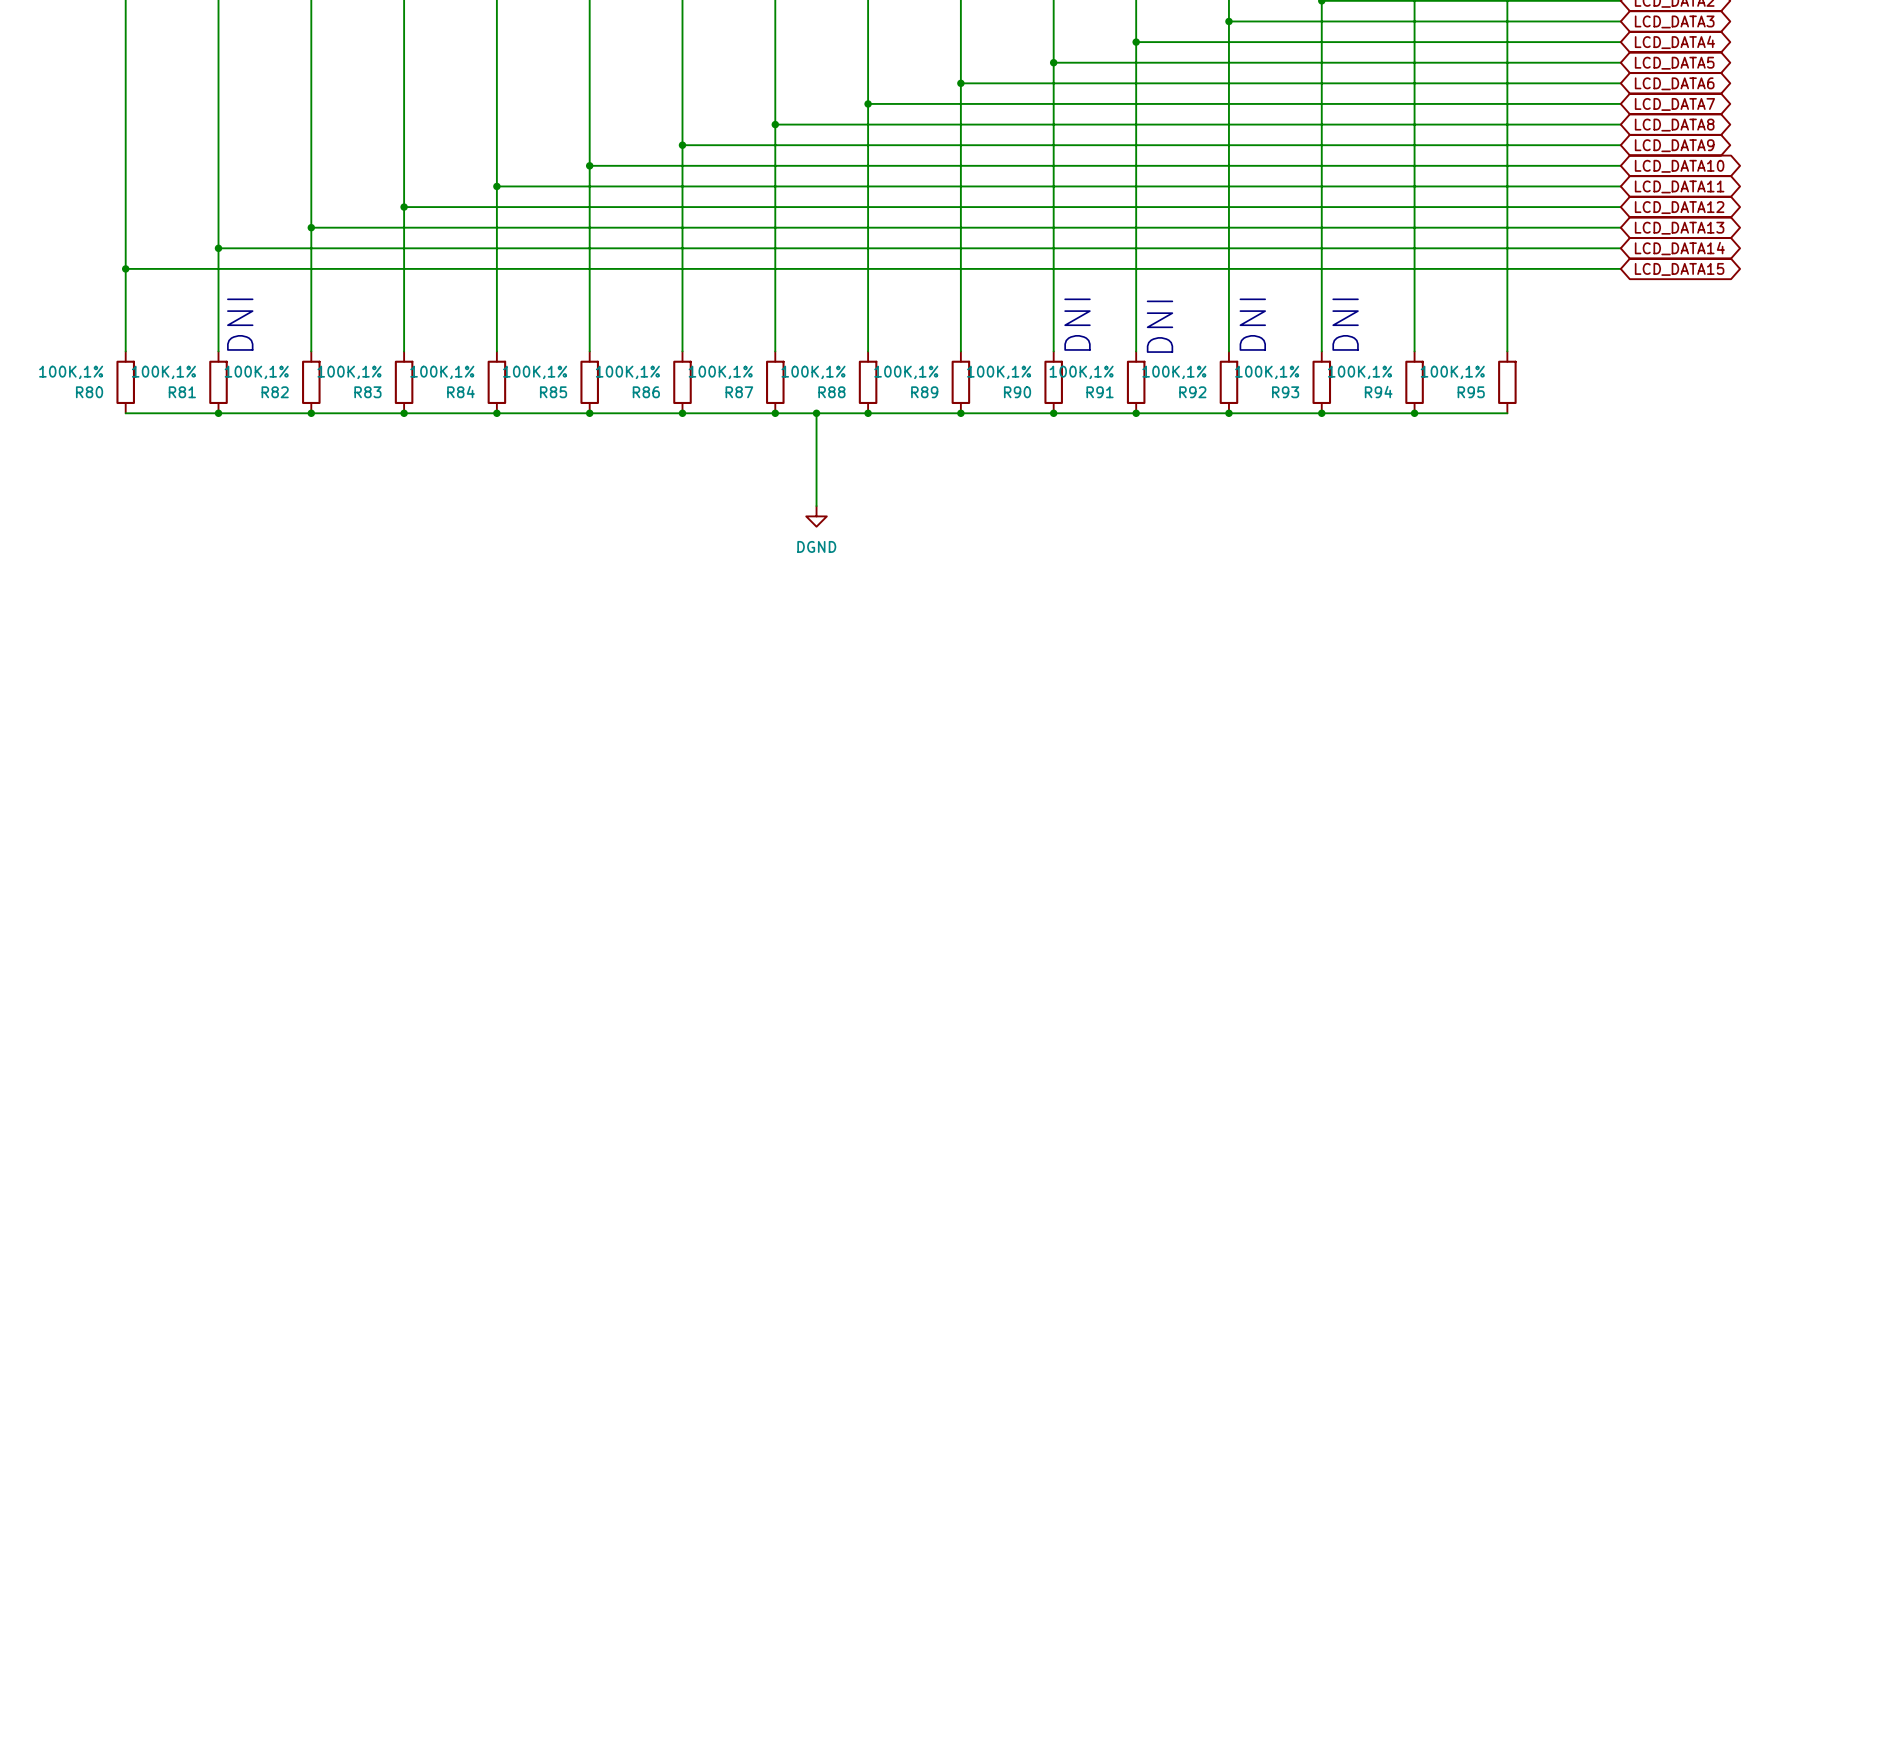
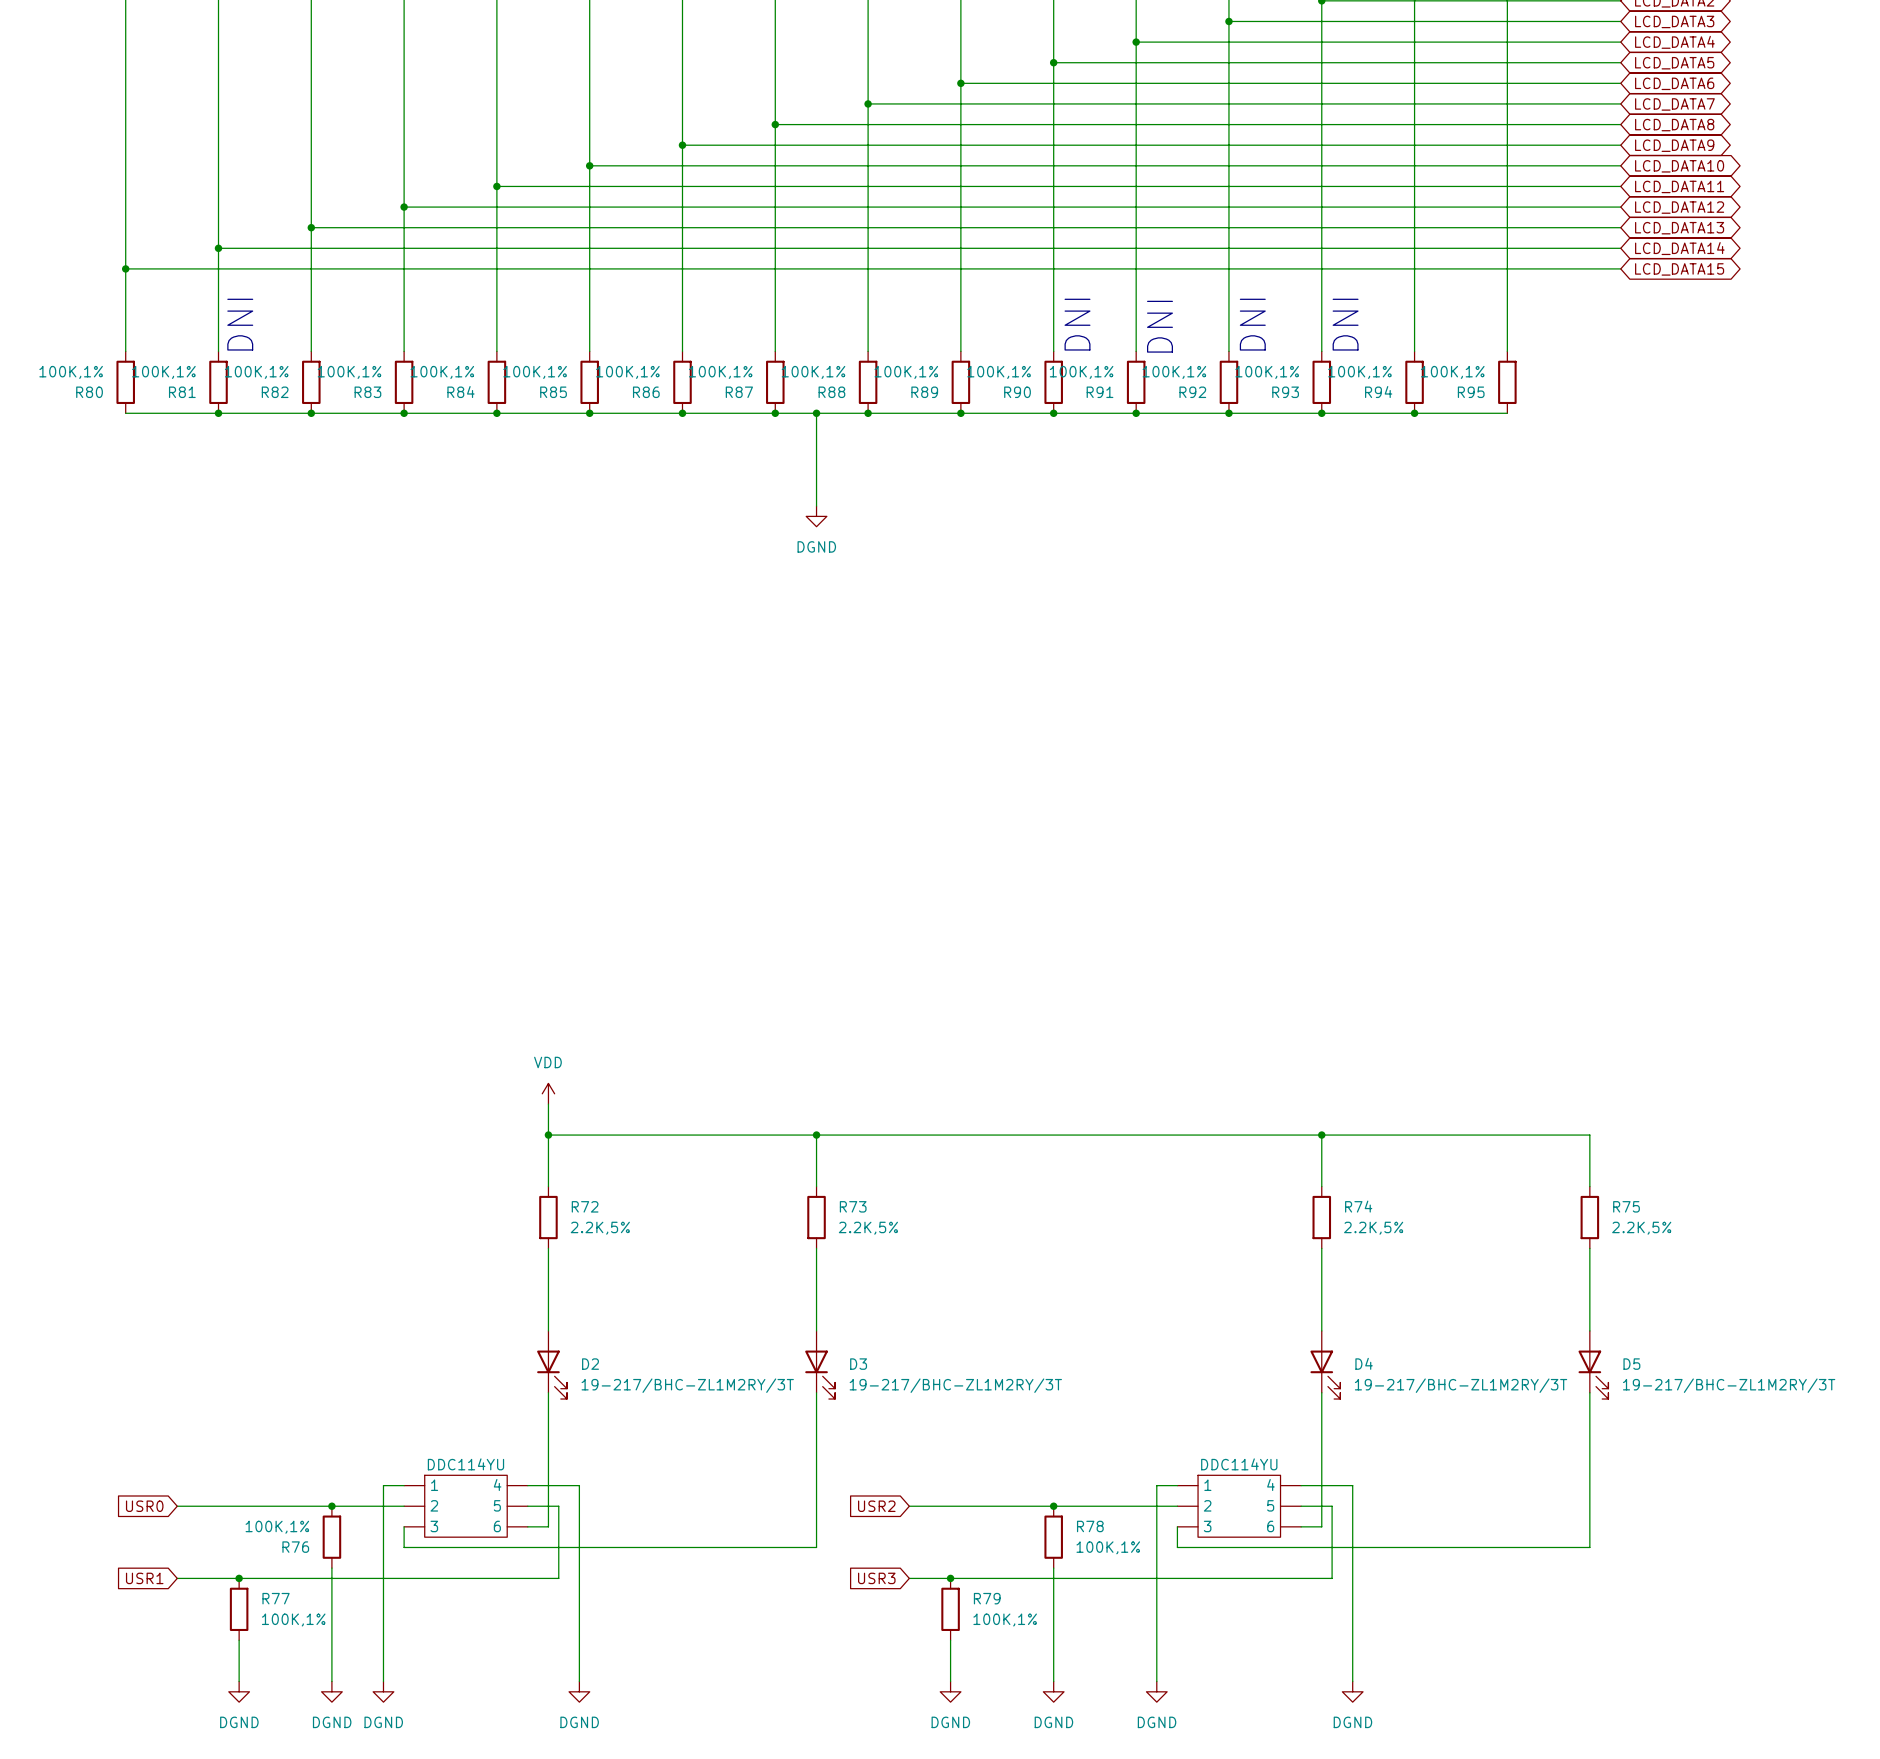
power symbol: none -> VDD (548, 1093)
wire: none -> (548, 1104) (548, 1186)
wire: none -> (548, 1135) (1589, 1135) (1589, 1186)
junction: none -> (548, 1135)
wire: none -> (816, 1135) (816, 1186)
junction: none -> (816, 1135)
wire: none -> (1321, 1135) (1321, 1186)
junction: none -> (1321, 1135)
R72: none -> 2.2K,5% (548, 1217)
R73: none -> 2.2K,5% (816, 1217)
R74: none -> 2.2K,5% (1321, 1217)
R75: none -> 2.2K,5% (1589, 1217)
wire: none -> (548, 1248) (548, 1330)
wire: none -> (816, 1248) (816, 1330)
wire: none -> (1321, 1248) (1321, 1330)
wire: none -> (1589, 1248) (1589, 1330)
D2: none -> 19-217/BHC-ZL1M2RY/3T (552, 1364)
D3: none -> 19-217/BHC-ZL1M2RY/3T (820, 1364)
D4: none -> 19-217/BHC-ZL1M2RY/3T (1325, 1364)
D5: none -> 19-217/BHC-ZL1M2RY/3T (1593, 1364)
wire: none -> (548, 1392) (548, 1526) (527, 1526)
wire: none -> (816, 1392) (816, 1547) (404, 1547) (404, 1526)
wire: none -> (1321, 1392) (1321, 1526) (1301, 1526)
wire: none -> (1589, 1392) (1589, 1547) (1177, 1547) (1177, 1526)
wire: none -> (404, 1485) (383, 1485) (383, 1681)
wire: none -> (527, 1485) (579, 1485) (579, 1681)
wire: none -> (1177, 1485) (1156, 1485) (1156, 1681)
wire: none -> (1301, 1485) (1352, 1485) (1352, 1681)
global label: none -> USR0 (144, 1506)
wire: none -> (177, 1506) (404, 1506)
junction: none -> (331, 1506)
part: none -> DDC114YU (465, 1506)
wire: none -> (527, 1506) (558, 1506) (558, 1578) (177, 1578)
global label: none -> USR2 (876, 1506)
wire: none -> (909, 1506) (1177, 1506)
junction: none -> (1053, 1506)
part: none -> DDC114YU (1239, 1506)
wire: none -> (1301, 1506) (1332, 1506) (1332, 1578) (909, 1578)
R76: none -> 100K,1% (331, 1537)
R78: none -> 100K,1% (1053, 1537)
wire: none -> (331, 1568) (331, 1681)
wire: none -> (1053, 1568) (1053, 1681)
global label: none -> USR1 (144, 1578)
junction: none -> (239, 1578)
global label: none -> USR3 (876, 1578)
junction: none -> (950, 1578)
R77: none -> 100K,1% (239, 1609)
R79: none -> 100K,1% (950, 1609)
wire: none -> (239, 1640) (239, 1681)
wire: none -> (950, 1640) (950, 1681)
power symbol: none -> DGND (239, 1691)
power symbol: none -> DGND (331, 1691)
power symbol: none -> DGND (383, 1691)
power symbol: none -> DGND (579, 1691)
power symbol: none -> DGND (950, 1691)
power symbol: none -> DGND (1053, 1691)
power symbol: none -> DGND (1156, 1691)
power symbol: none -> DGND (1352, 1691)

